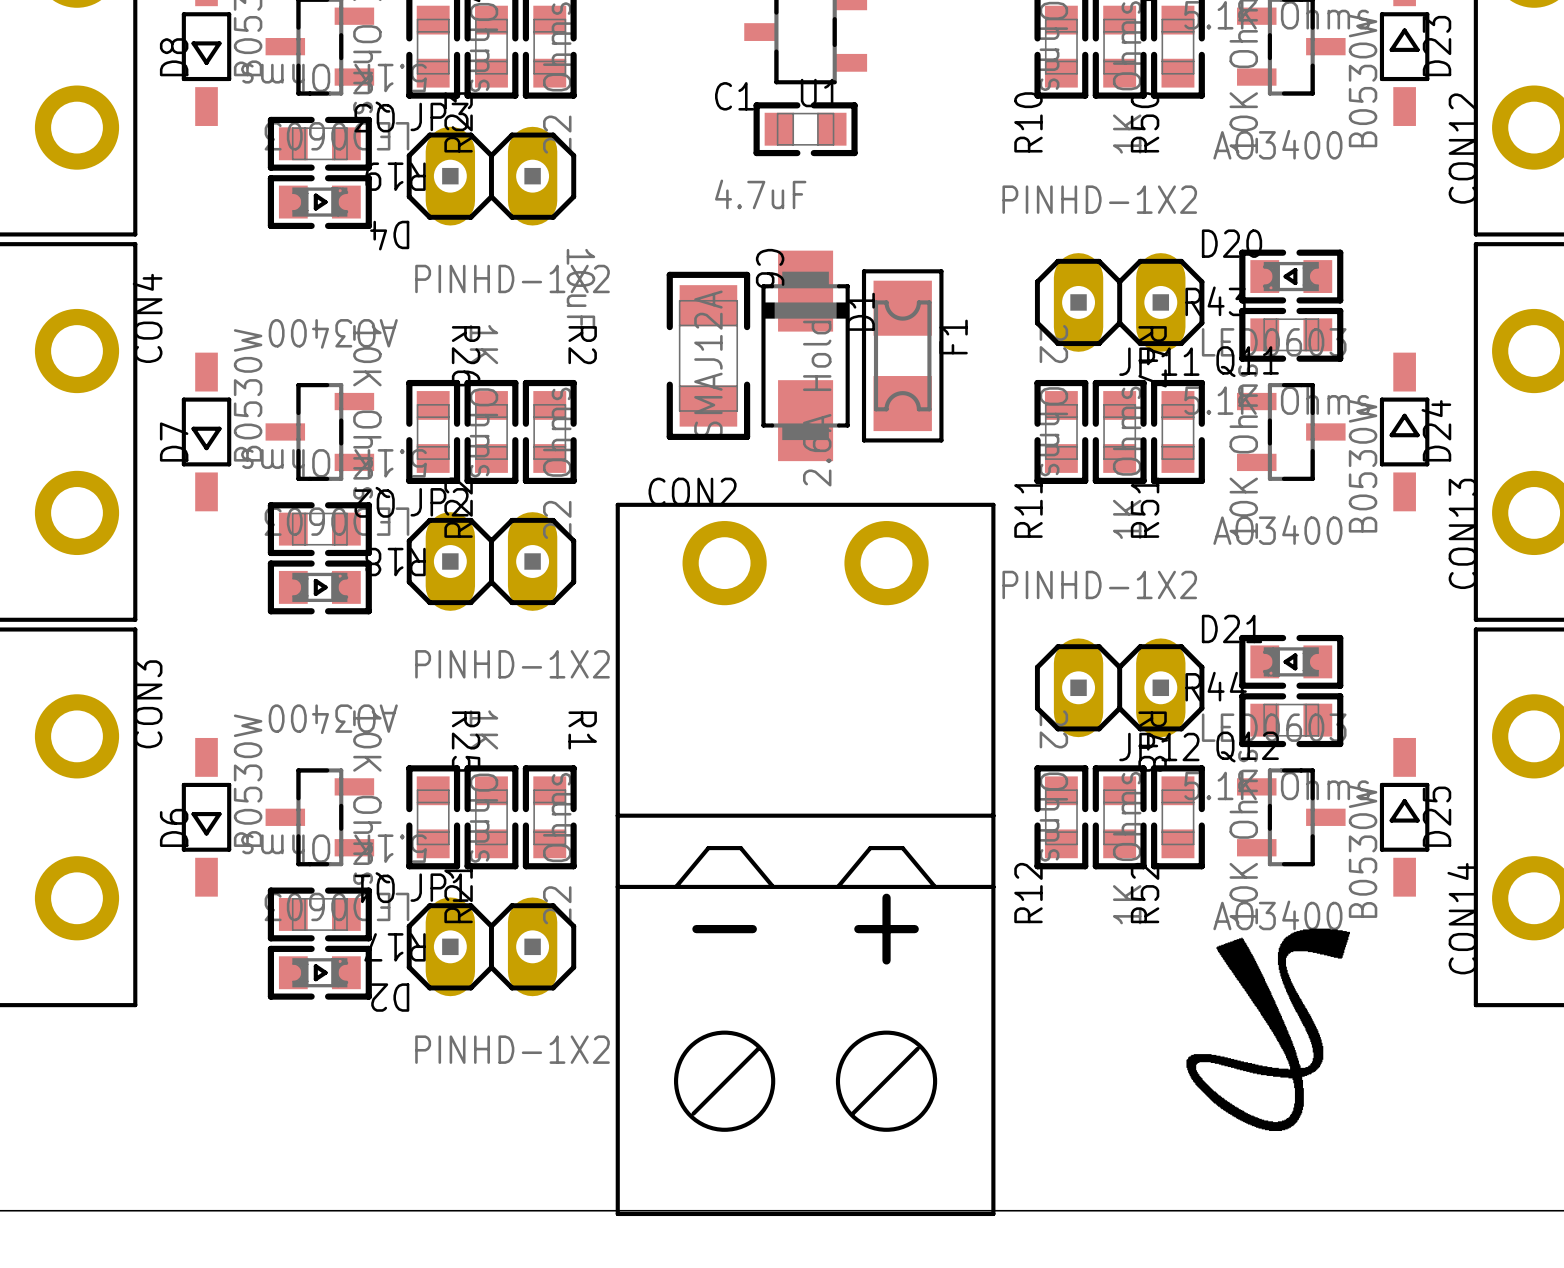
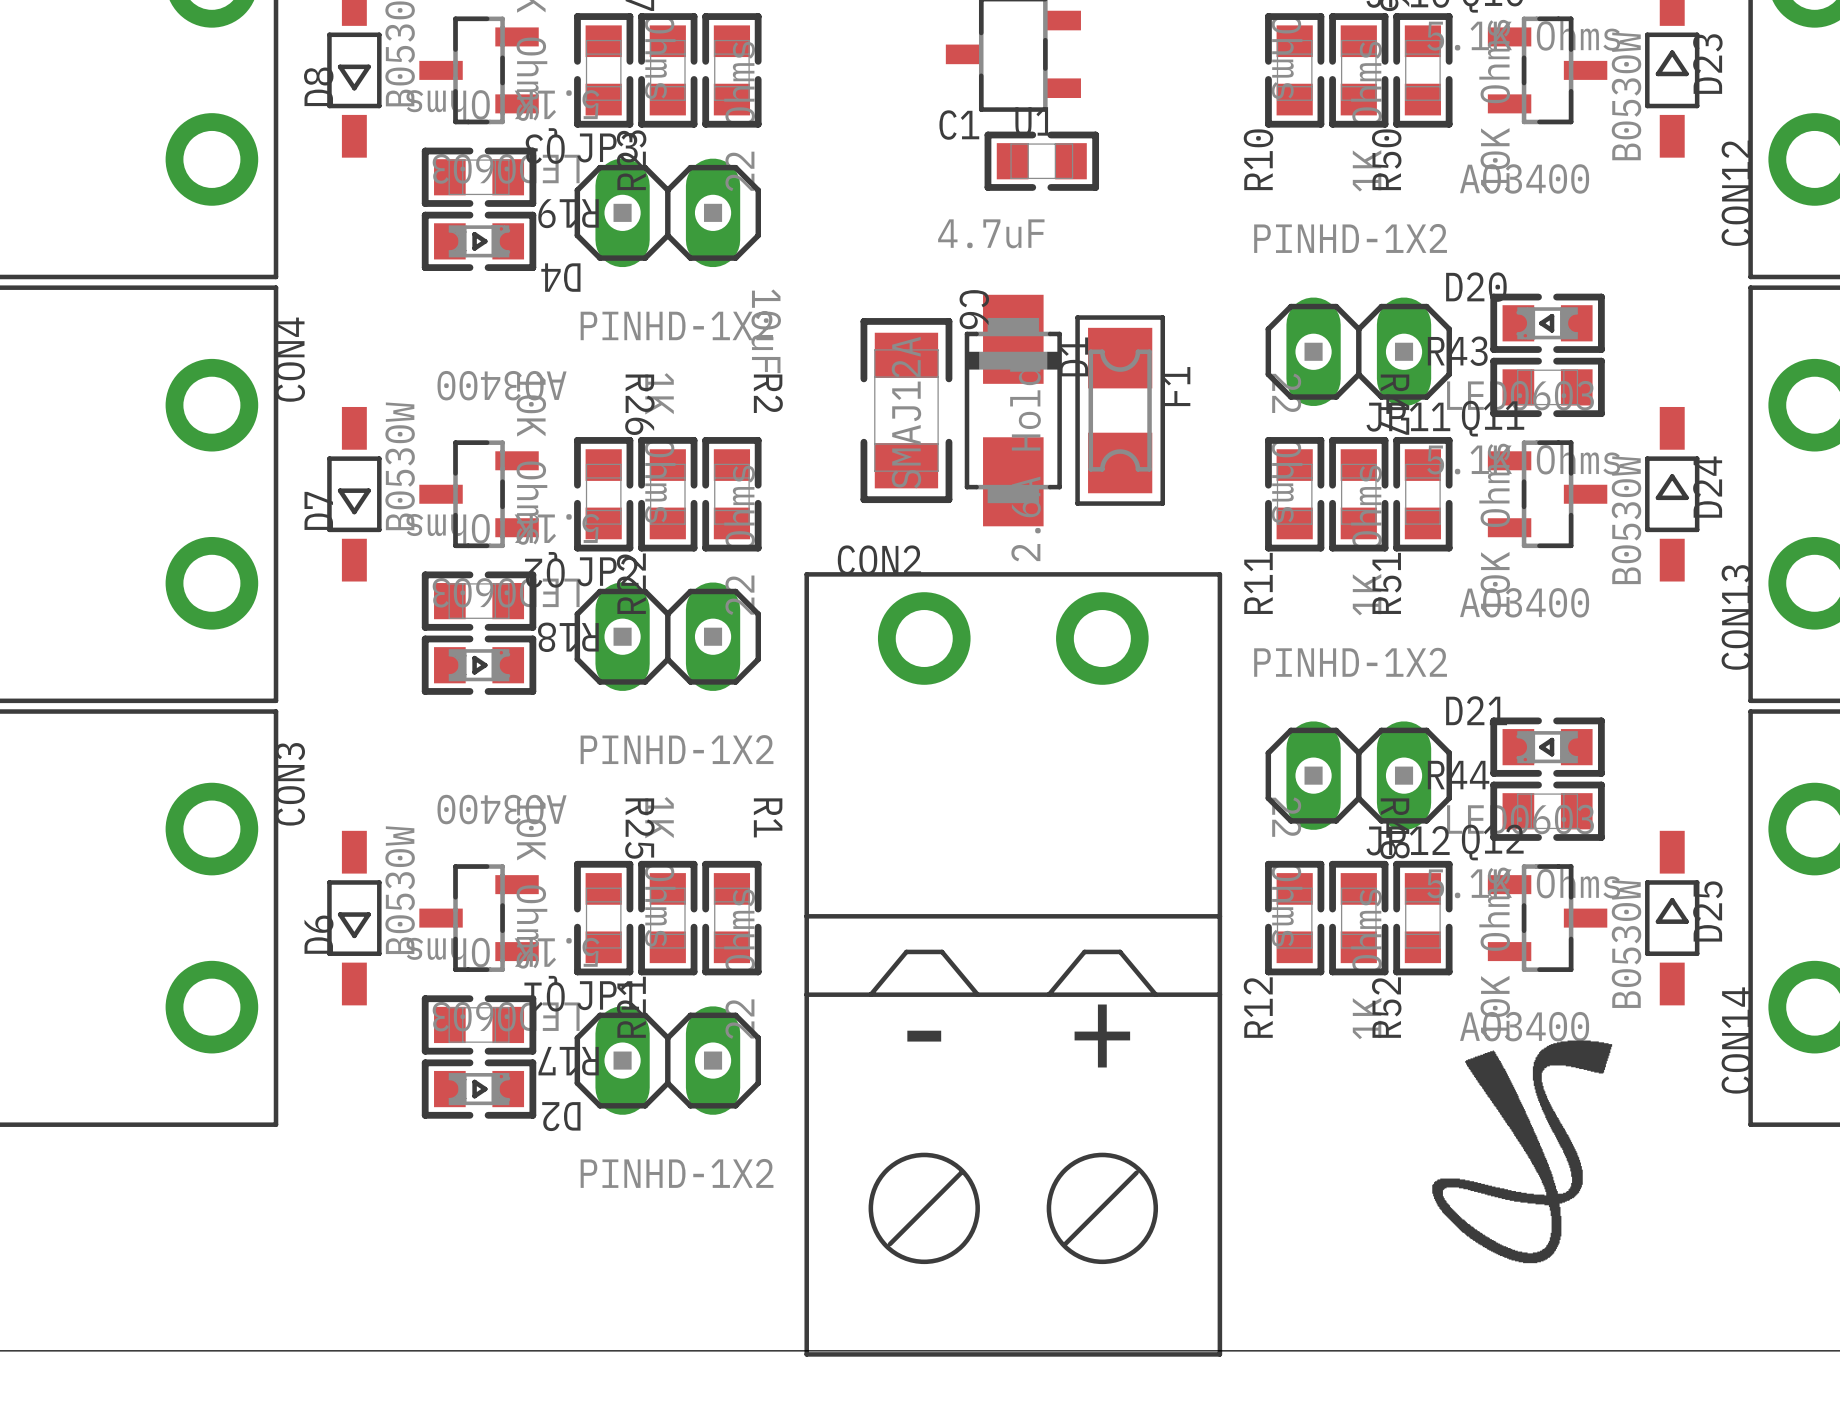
C1 position: (805, 129) -> (1041, 161)

